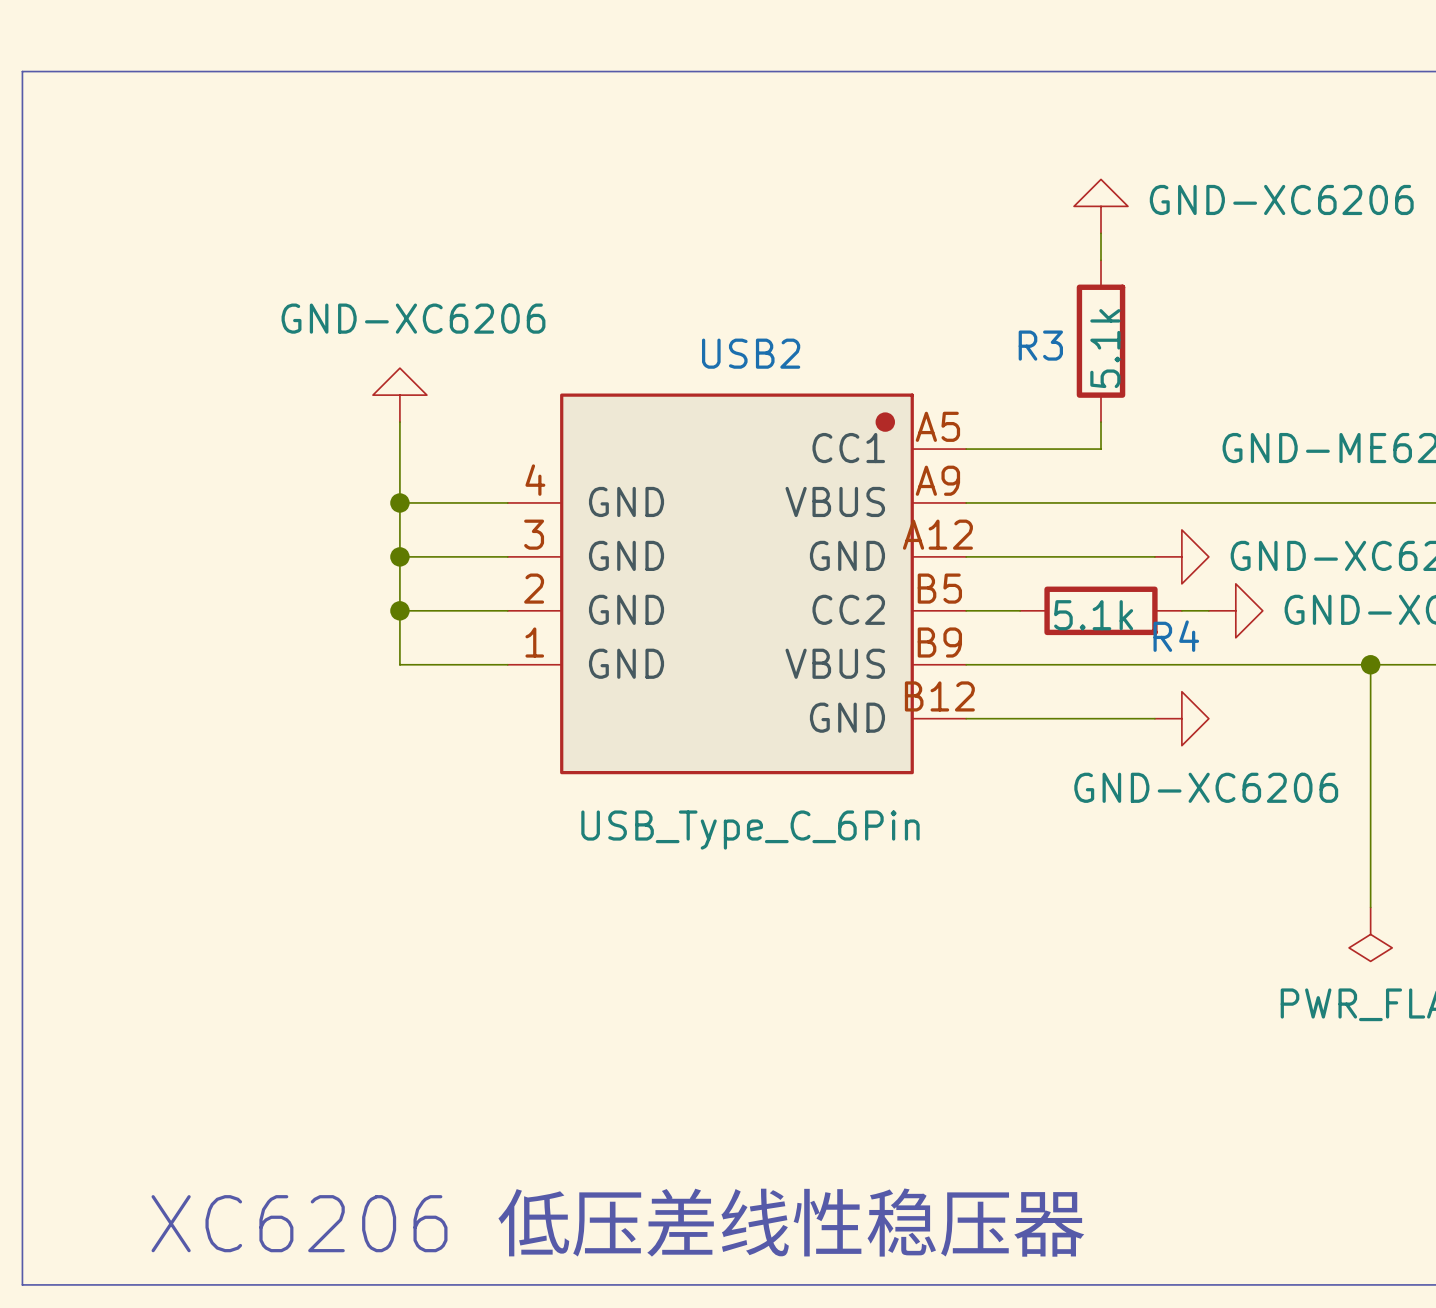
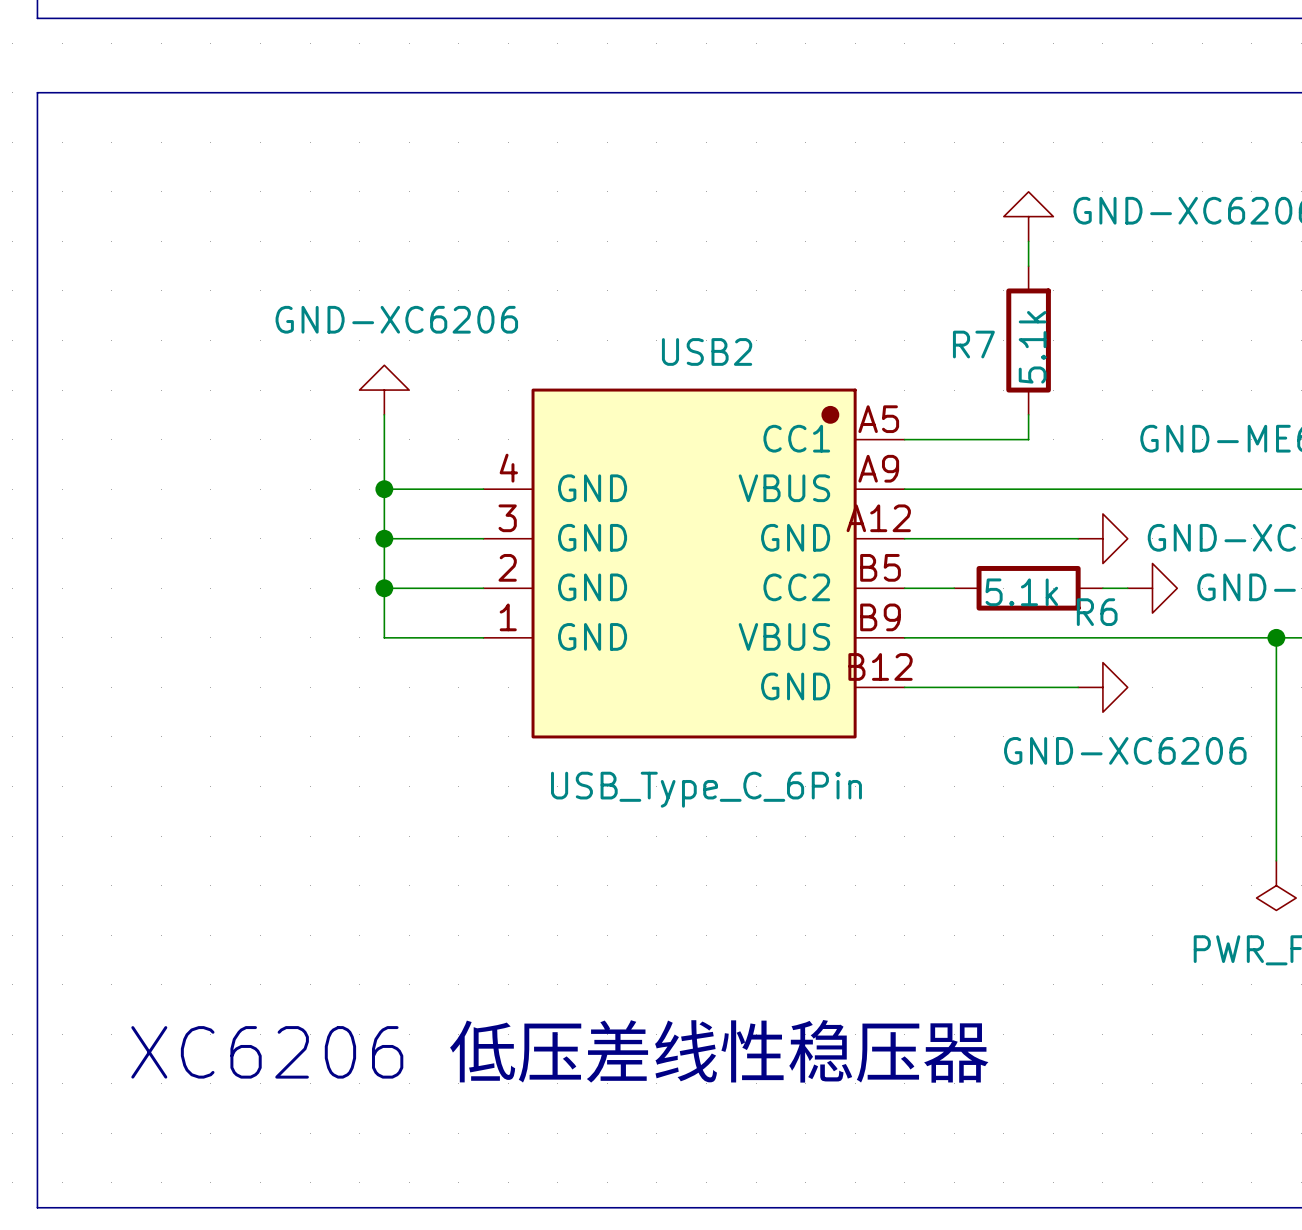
R3 name: R3 (1040, 345) -> R7 (973, 344)
R4 name: R4 (1176, 636) -> R6 (1097, 612)
text position: XC6206 低压差线性稳压器 (618, 1222) -> XC6206 低压差线性稳压器 (560, 1051)

